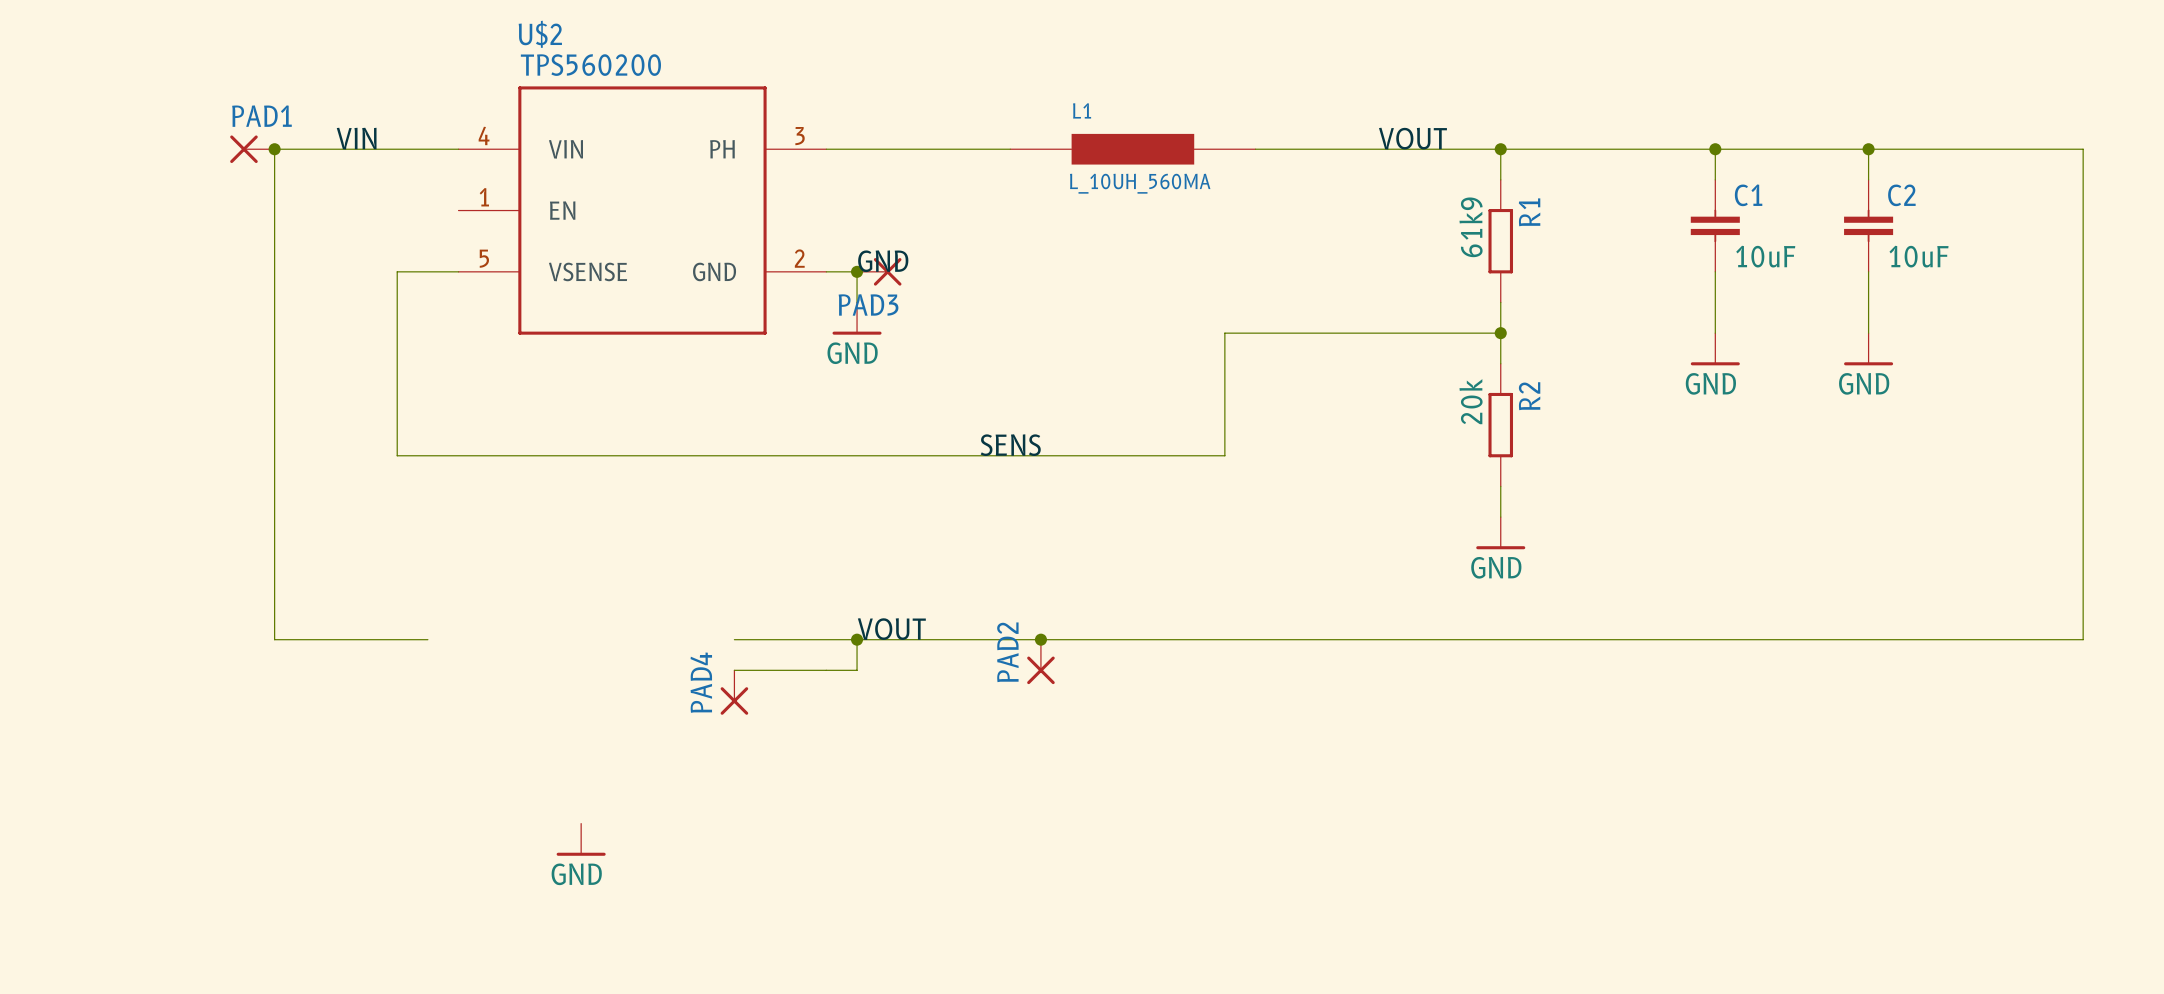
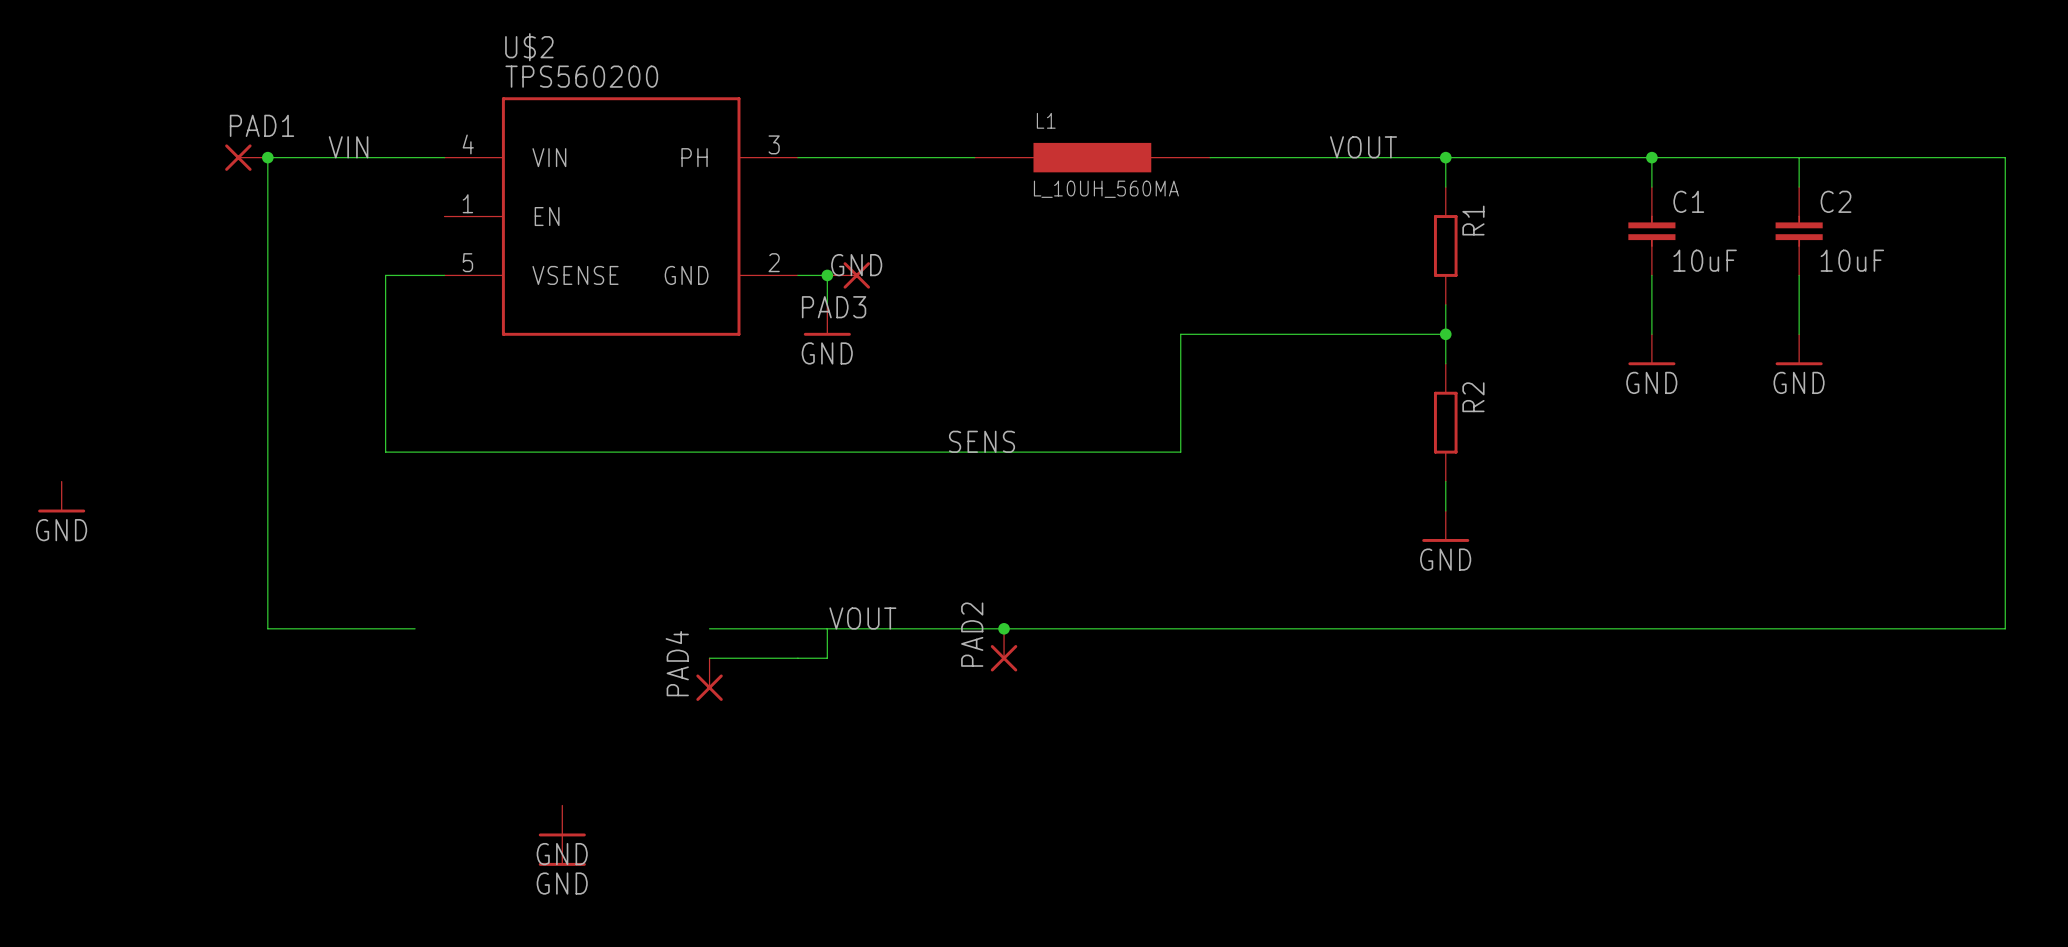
junction: (1868, 149) -> none
R1 value: 61k9 (1471, 227) -> none
R2 value: 20k (1471, 401) -> none
power symbol: none -> GND (61, 497)
junction: (857, 639) -> none
power symbol: none -> GND (562, 850)

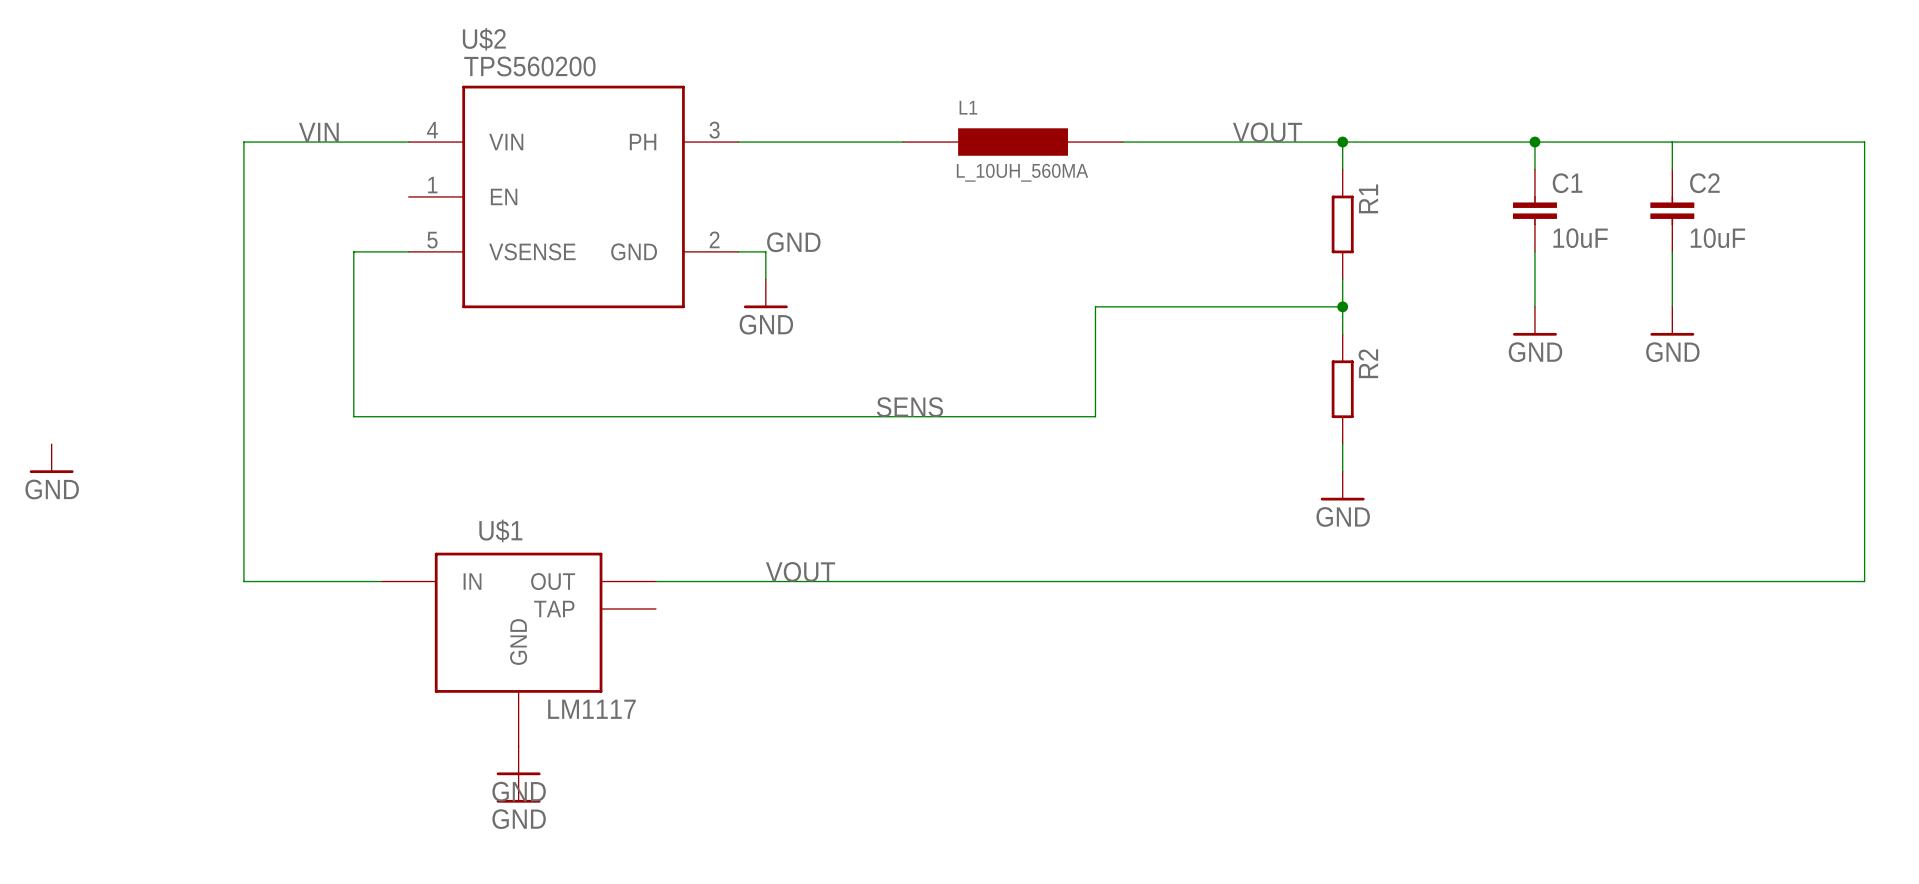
PAD1: (246, 157) -> none
junction: (267, 157) -> none
junction: (827, 275) -> none
PAD3: (848, 275) -> none
wire: (827, 628) (827, 658) (709, 658) -> none
junction: (1004, 628) -> none
PAD2: (1004, 650) -> none
PAD4: (709, 679) -> none
U$1: none -> LM1117 (518, 649)

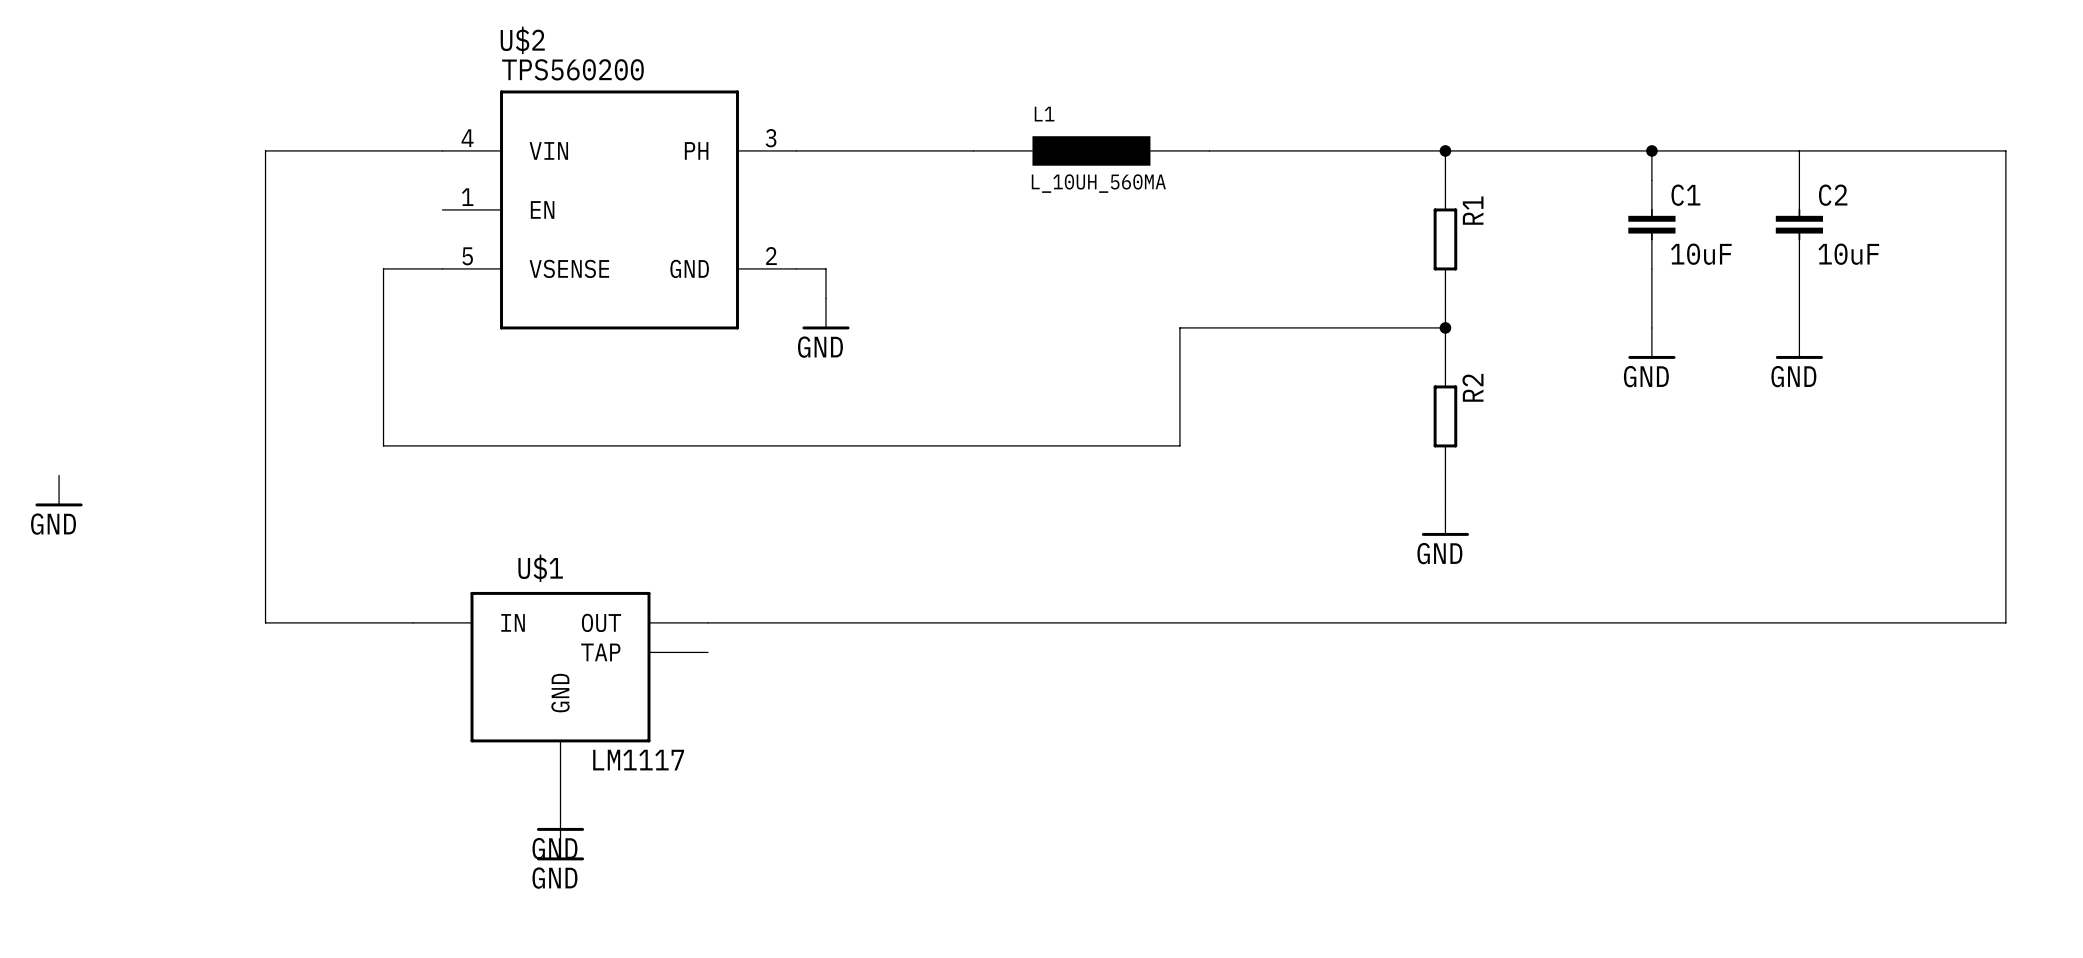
label: VIN (318, 132) -> none
label: VOUT (1267, 132) -> none
label: GND (793, 242) -> none
label: SENS (909, 407) -> none
label: VOUT (800, 571) -> none

